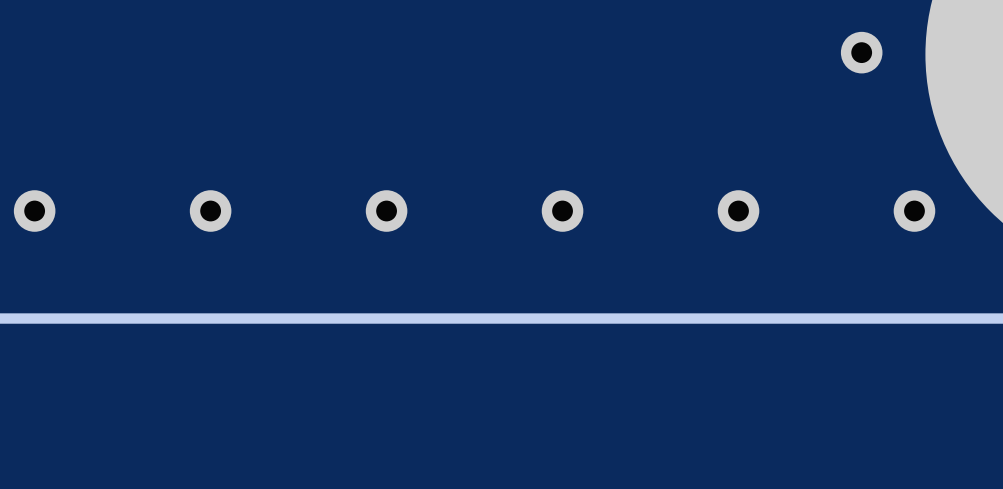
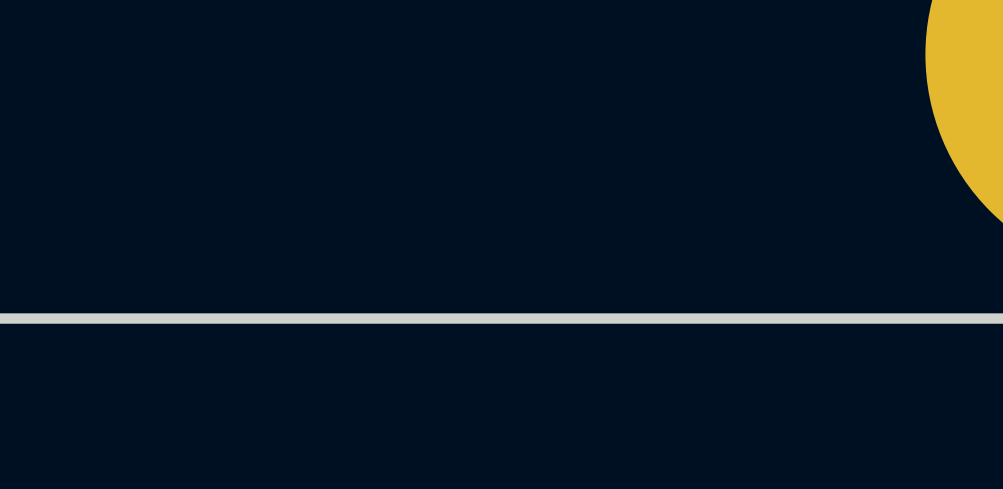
part: (861, 52) -> none
part: (34, 211) -> none
part: (210, 211) -> none
part: (386, 211) -> none
part: (562, 211) -> none
part: (738, 211) -> none
part: (914, 211) -> none

